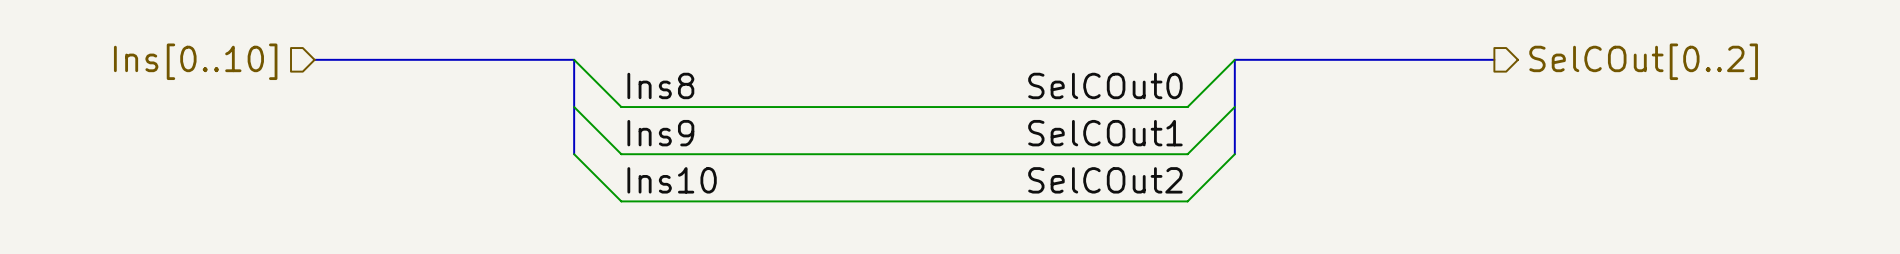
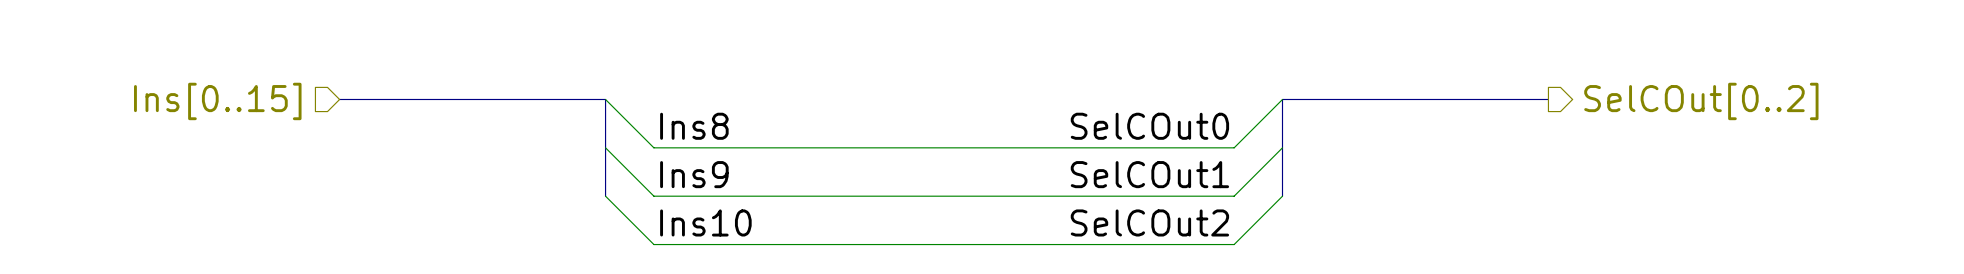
hierarchical label: Ins[0..10] (195, 61) -> Ins[0..15] (217, 101)

